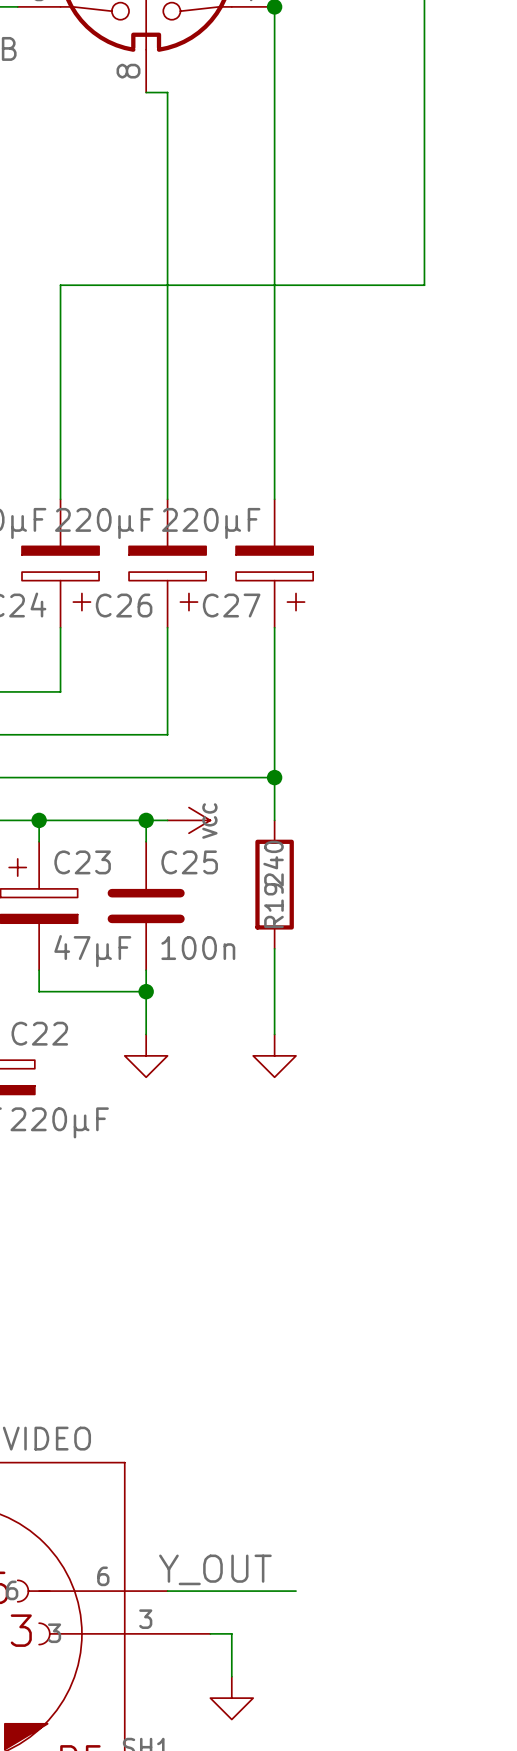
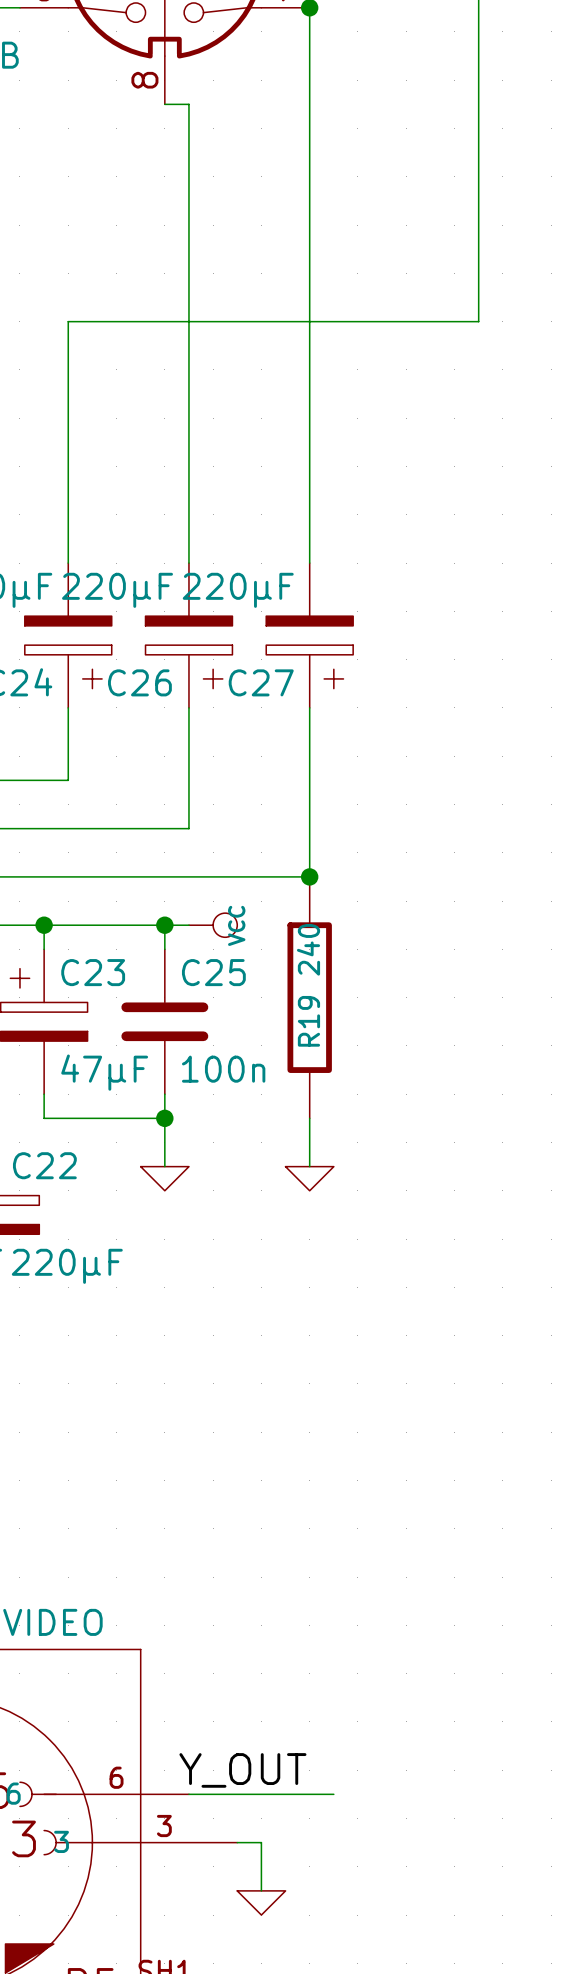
power symbol shape: [167, 807, 211, 834] -> [188, 913, 238, 938]
R19 symbol: [255, 820, 294, 949] -> [287, 876, 332, 1119]
power symbol shape: [124, 1034, 168, 1078] -> [140, 1166, 189, 1191]
power symbol shape: [253, 1034, 297, 1078] -> [285, 1166, 334, 1191]
power symbol shape: [210, 1676, 254, 1720] -> [237, 1890, 286, 1916]

